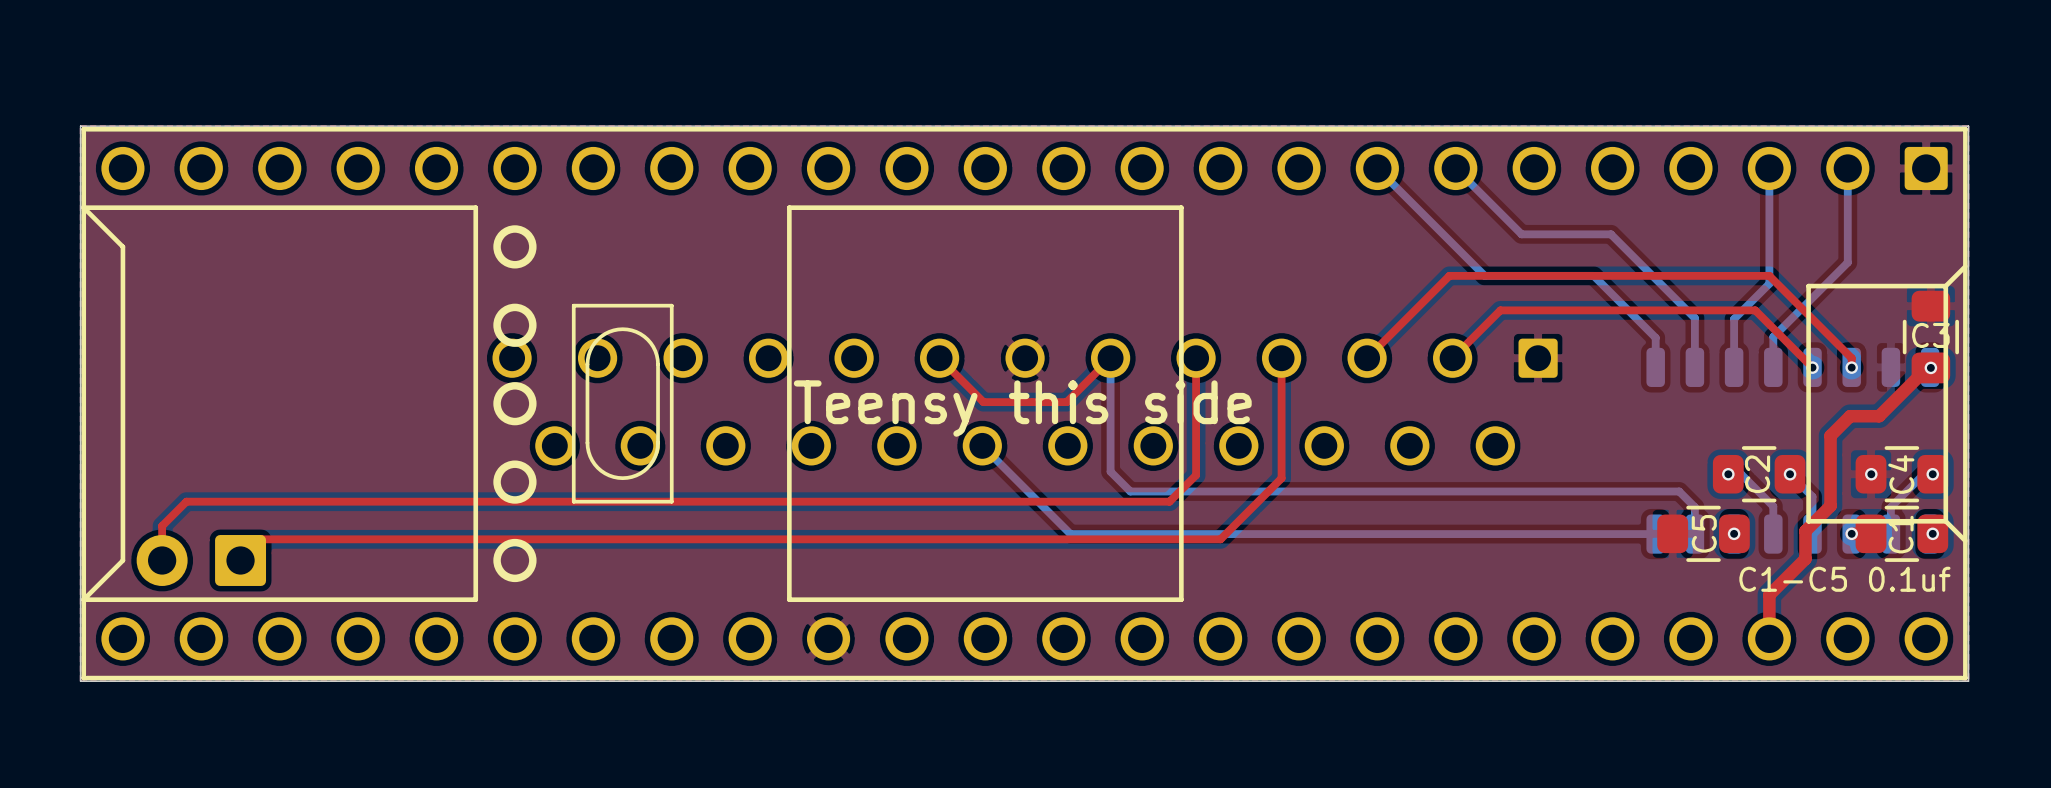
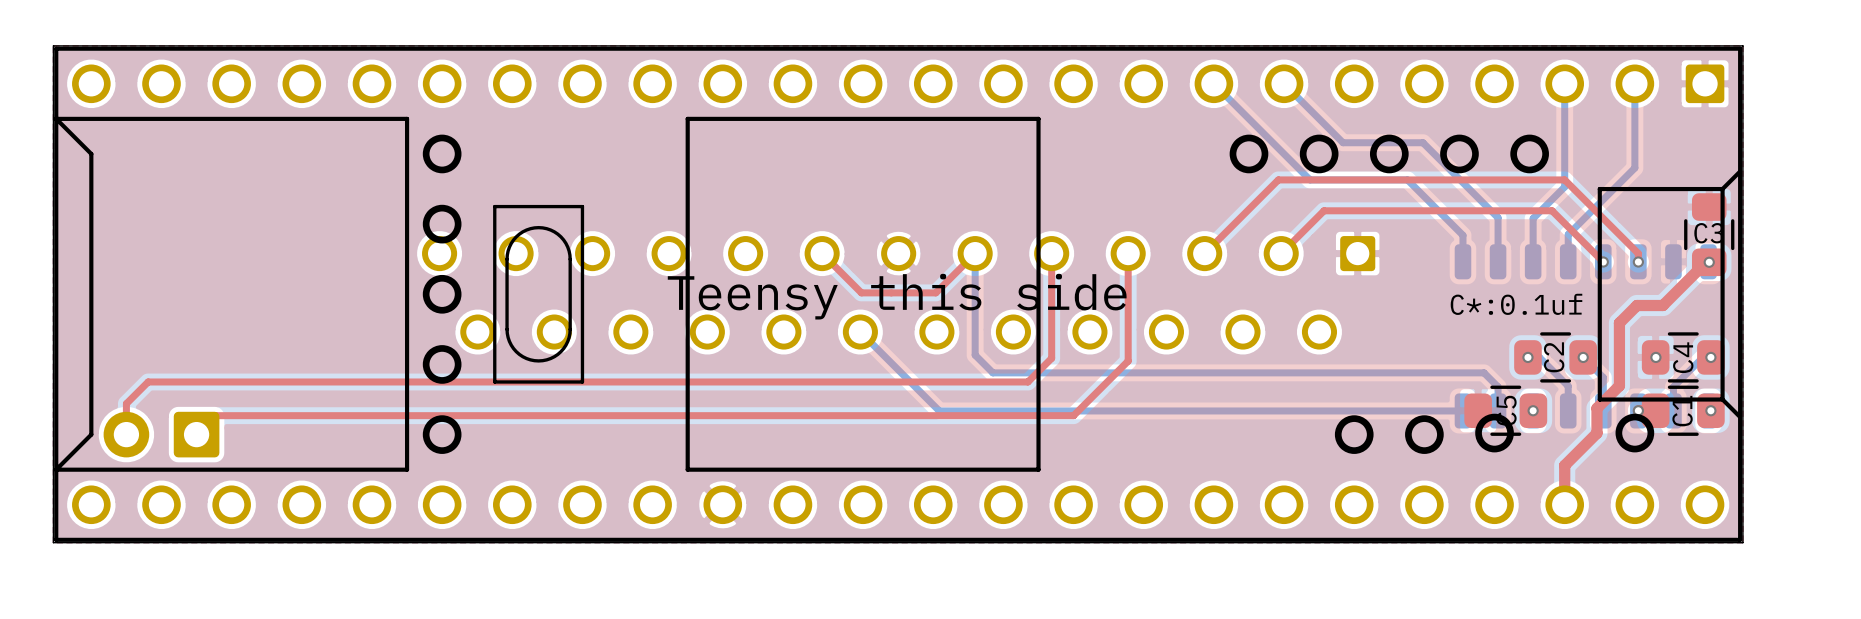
part footprint: [81, 126, 1968, 681] -> [54, 46, 1743, 542]
text: none -> C*:0.1uf (1516, 304)
text: C1-C5 0.1uf (1844, 579) -> none

